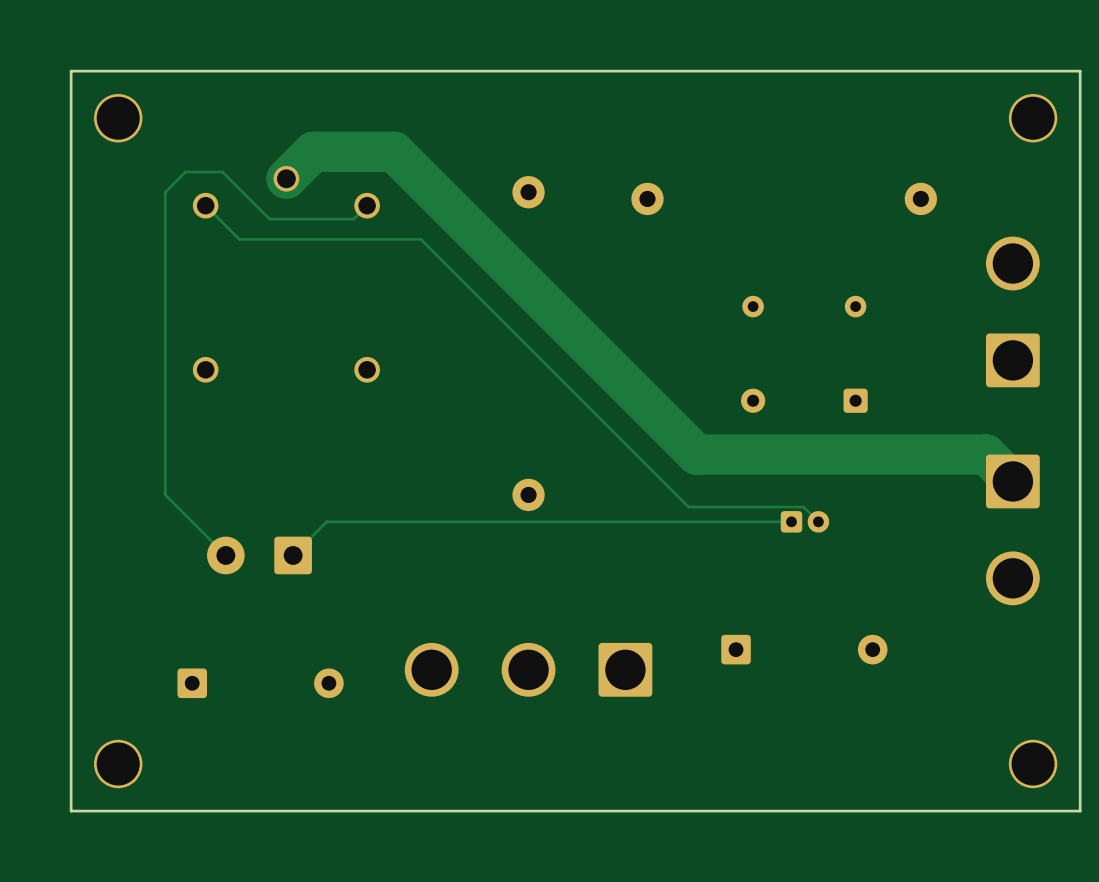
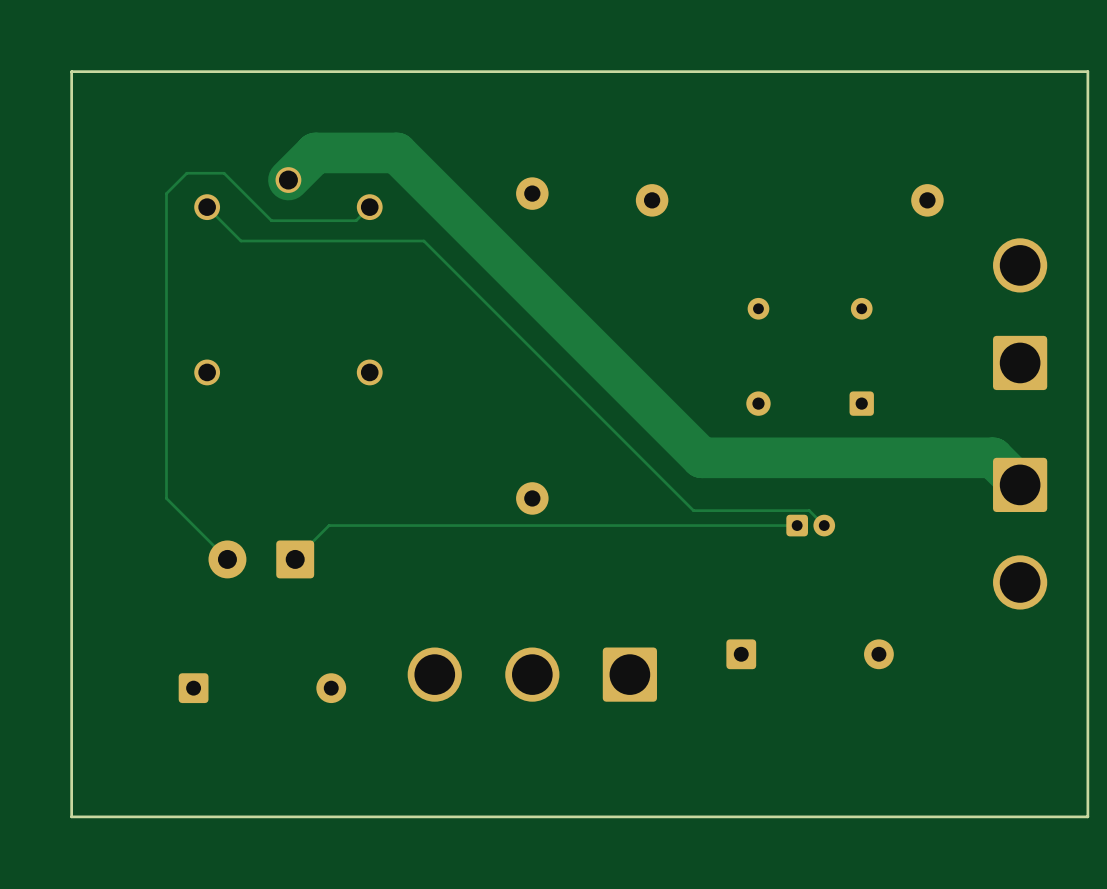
part: (118, 118) -> none
part: (1033, 118) -> none
part: (118, 763) -> none
part: (1033, 763) -> none

